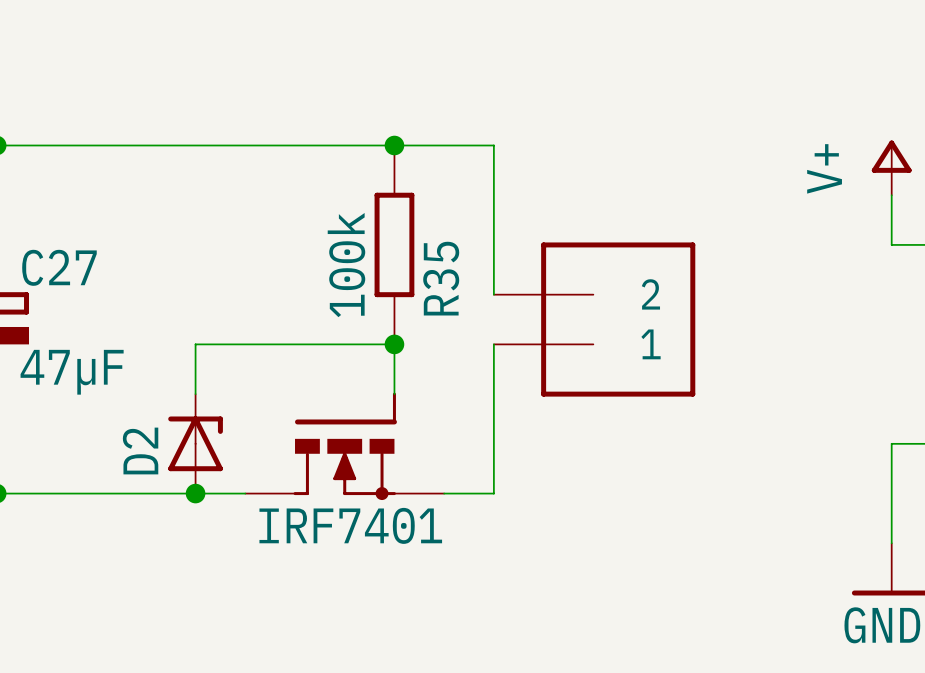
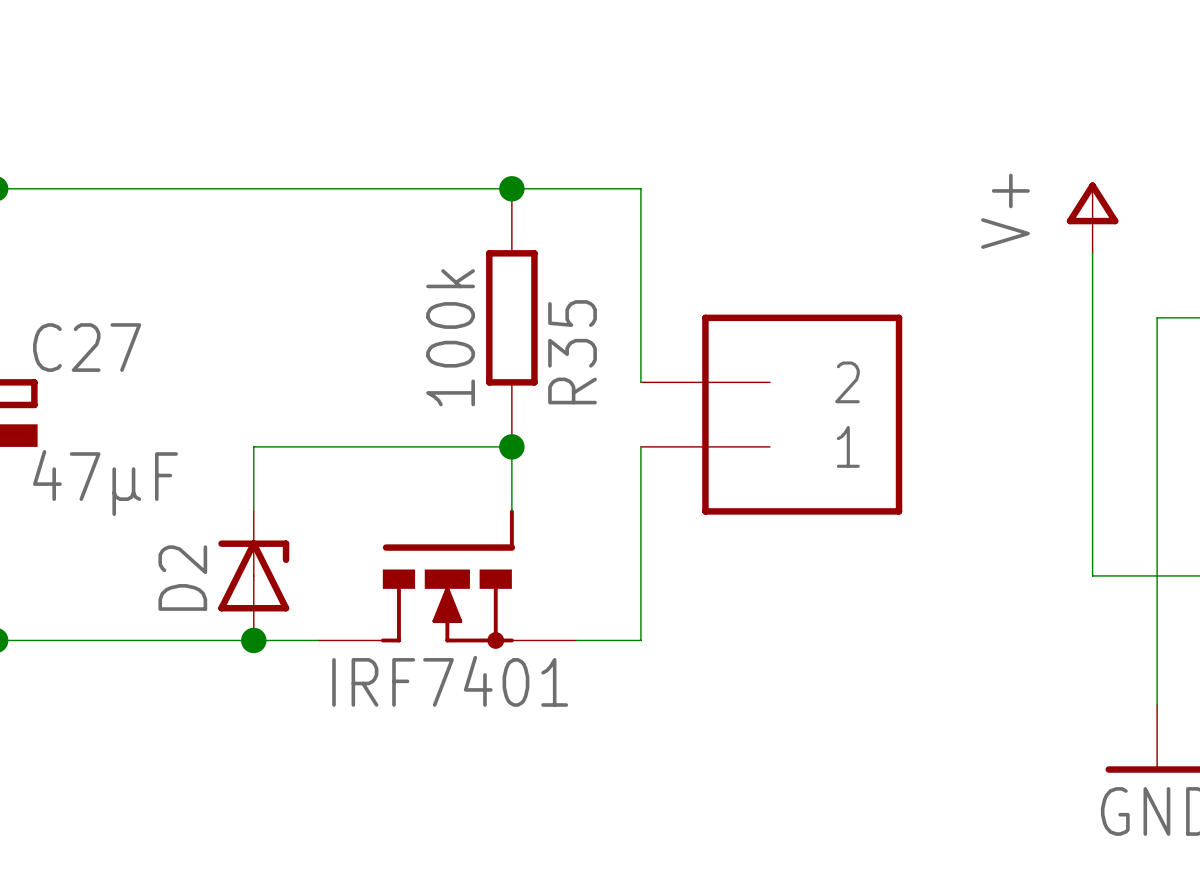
power symbol position: V+ (891, 167) -> V+ (1092, 217)
wire: (891, 195) (891, 244) -> (1092, 253) (1092, 575) (1157, 575) (1157, 317)

